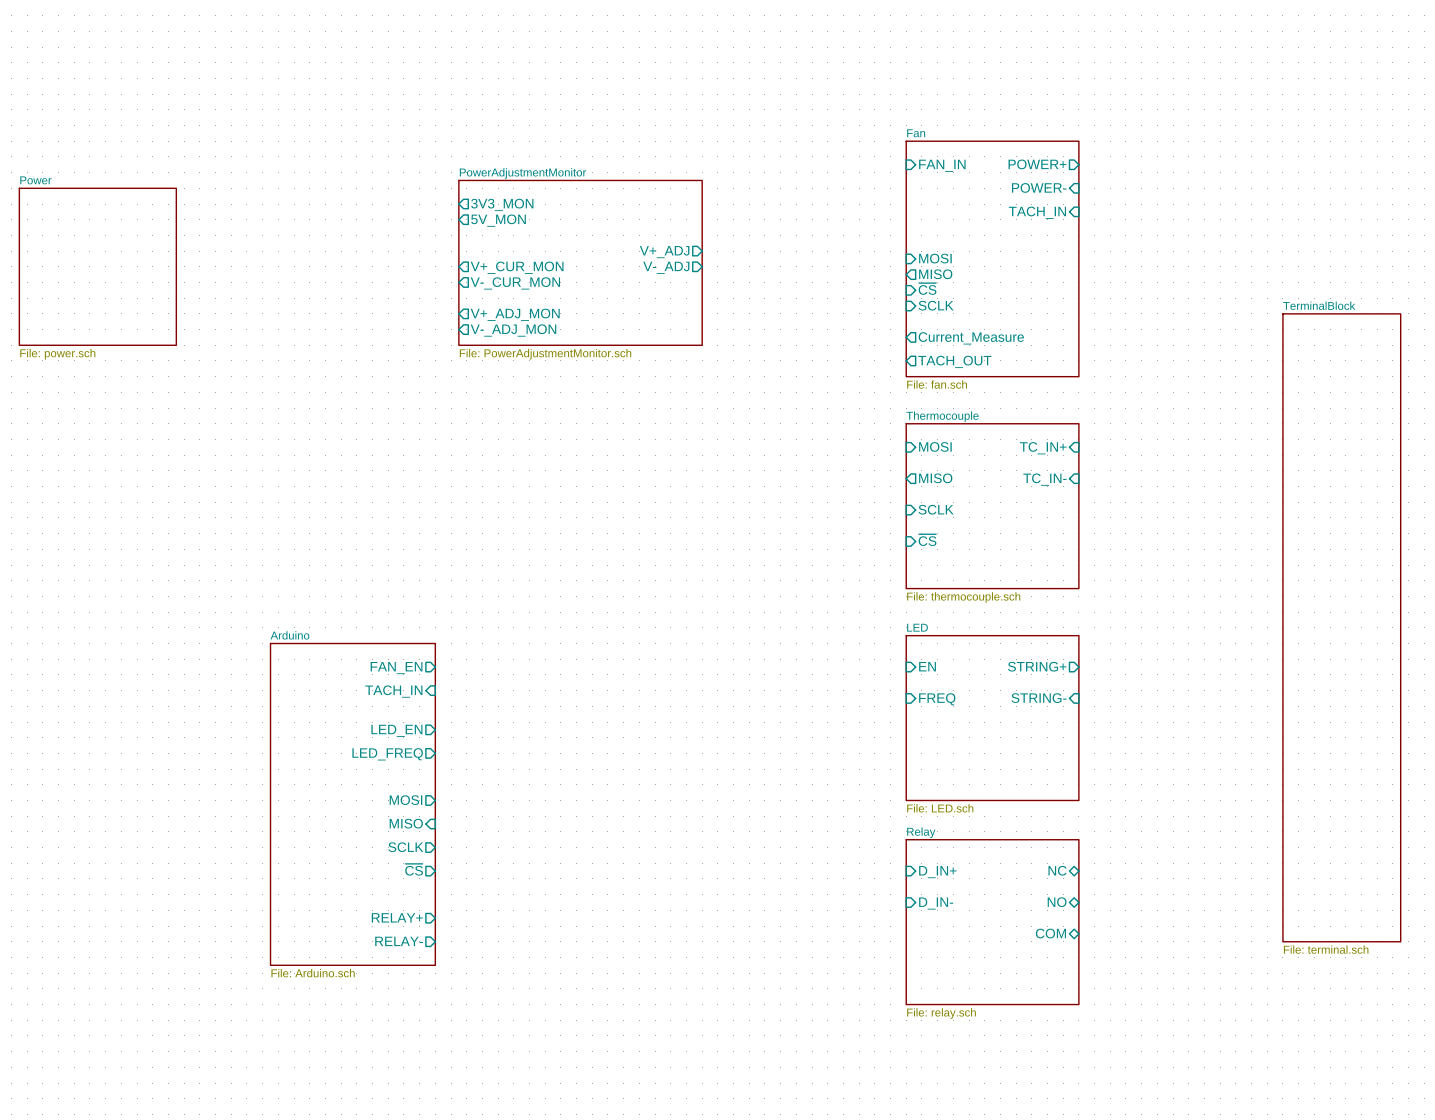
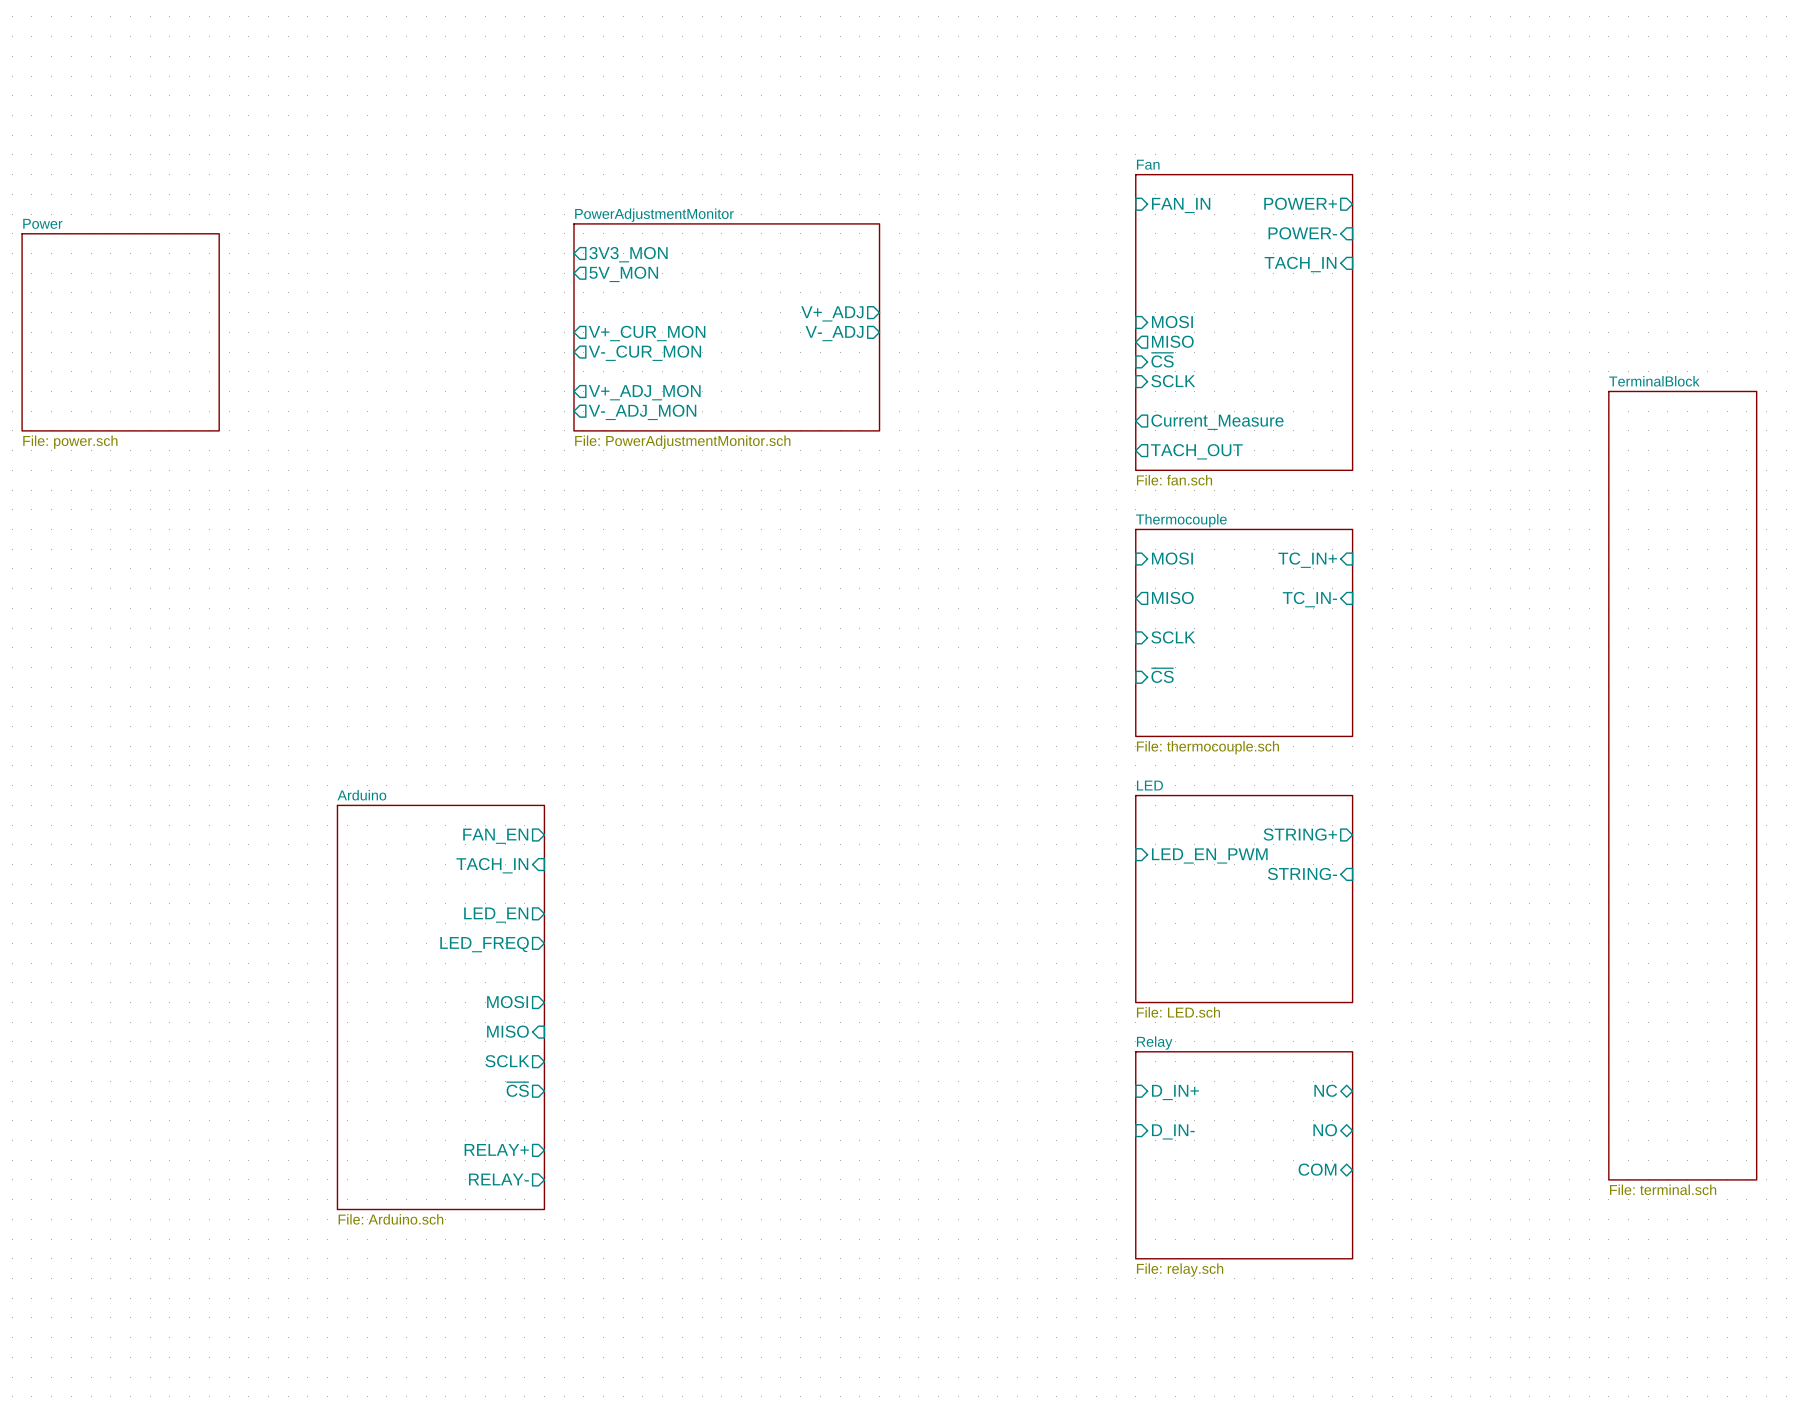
sheet pin: EN (927, 666) -> none
sheet pin: none -> LED_EN_PWM (1209, 855)
sheet pin: FREQ (937, 699) -> none

